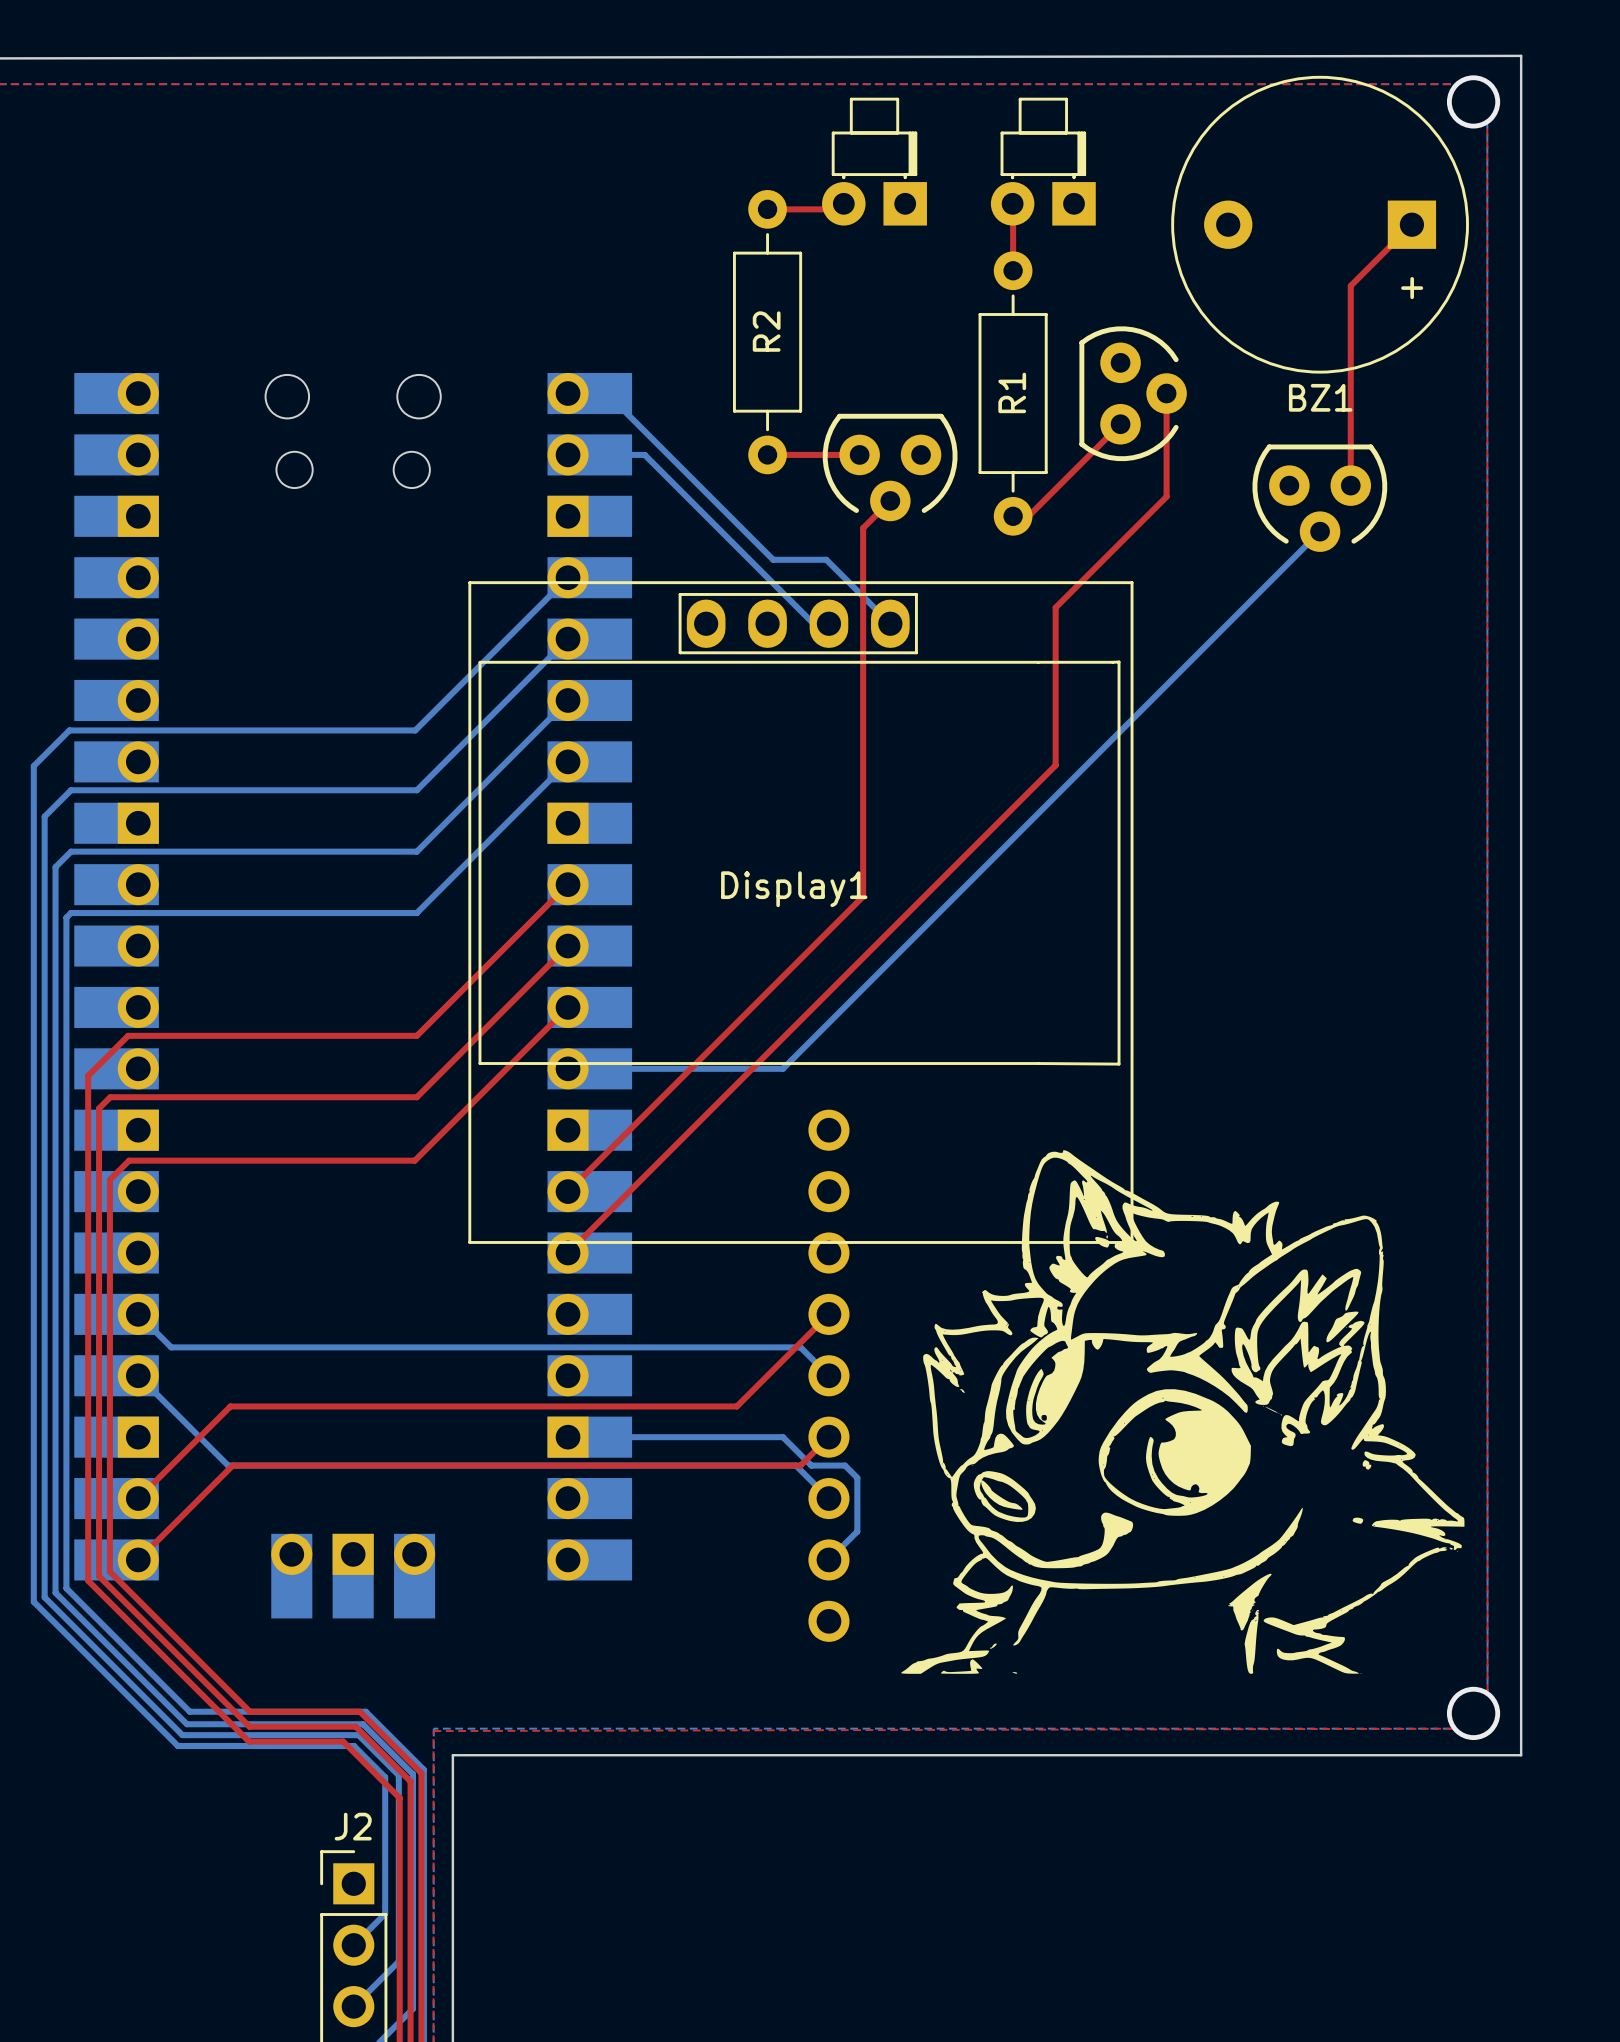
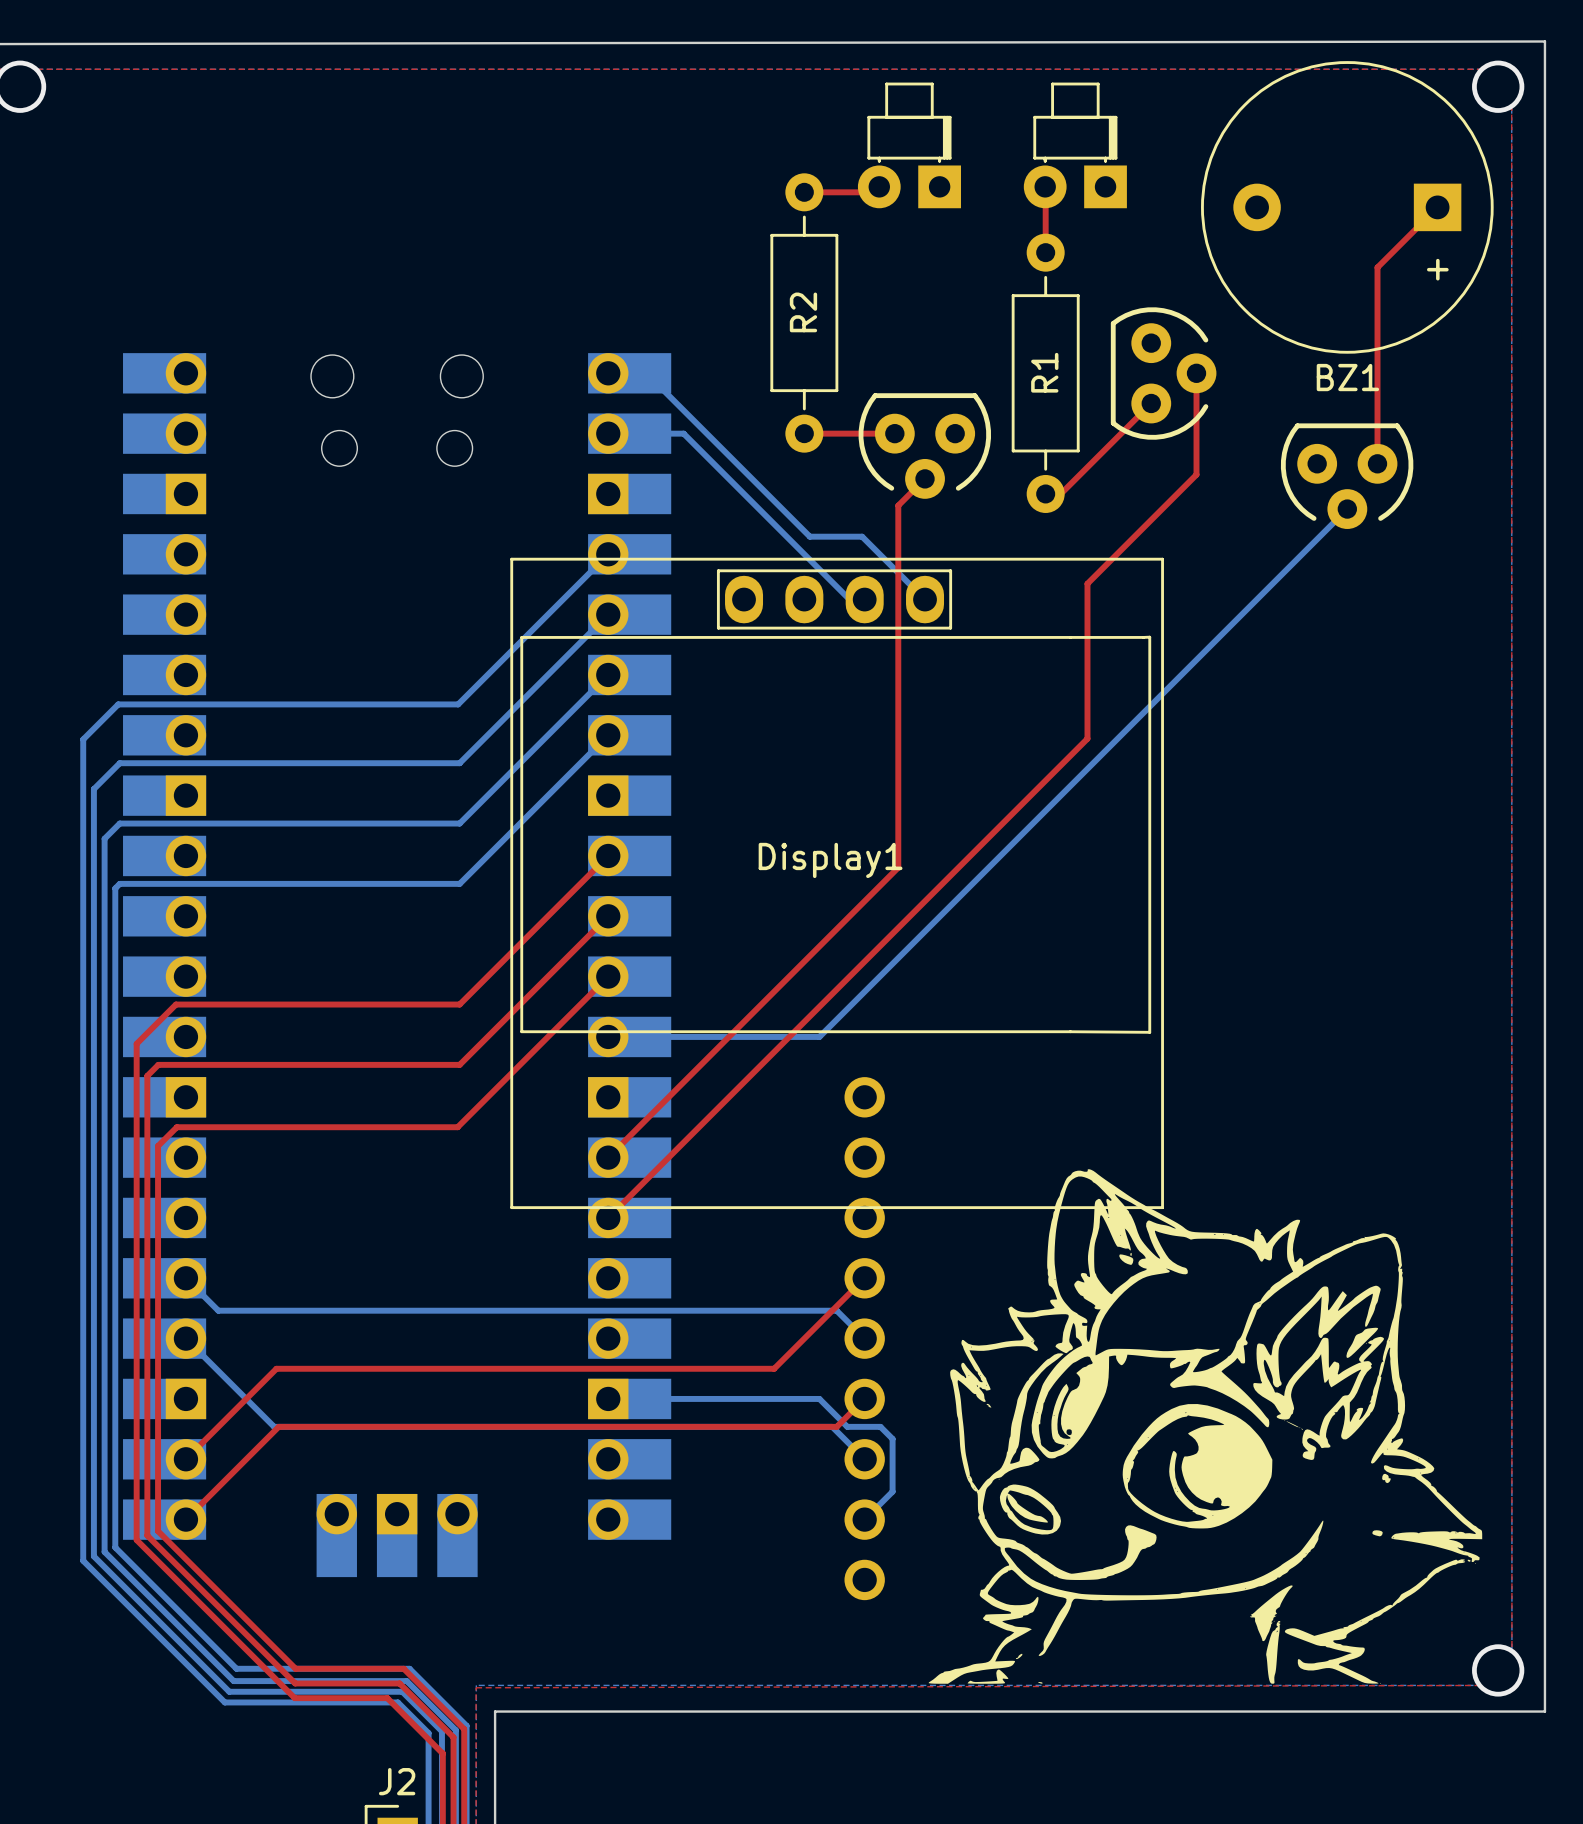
drawing position: (1182, 1412) -> (1205, 1426)

